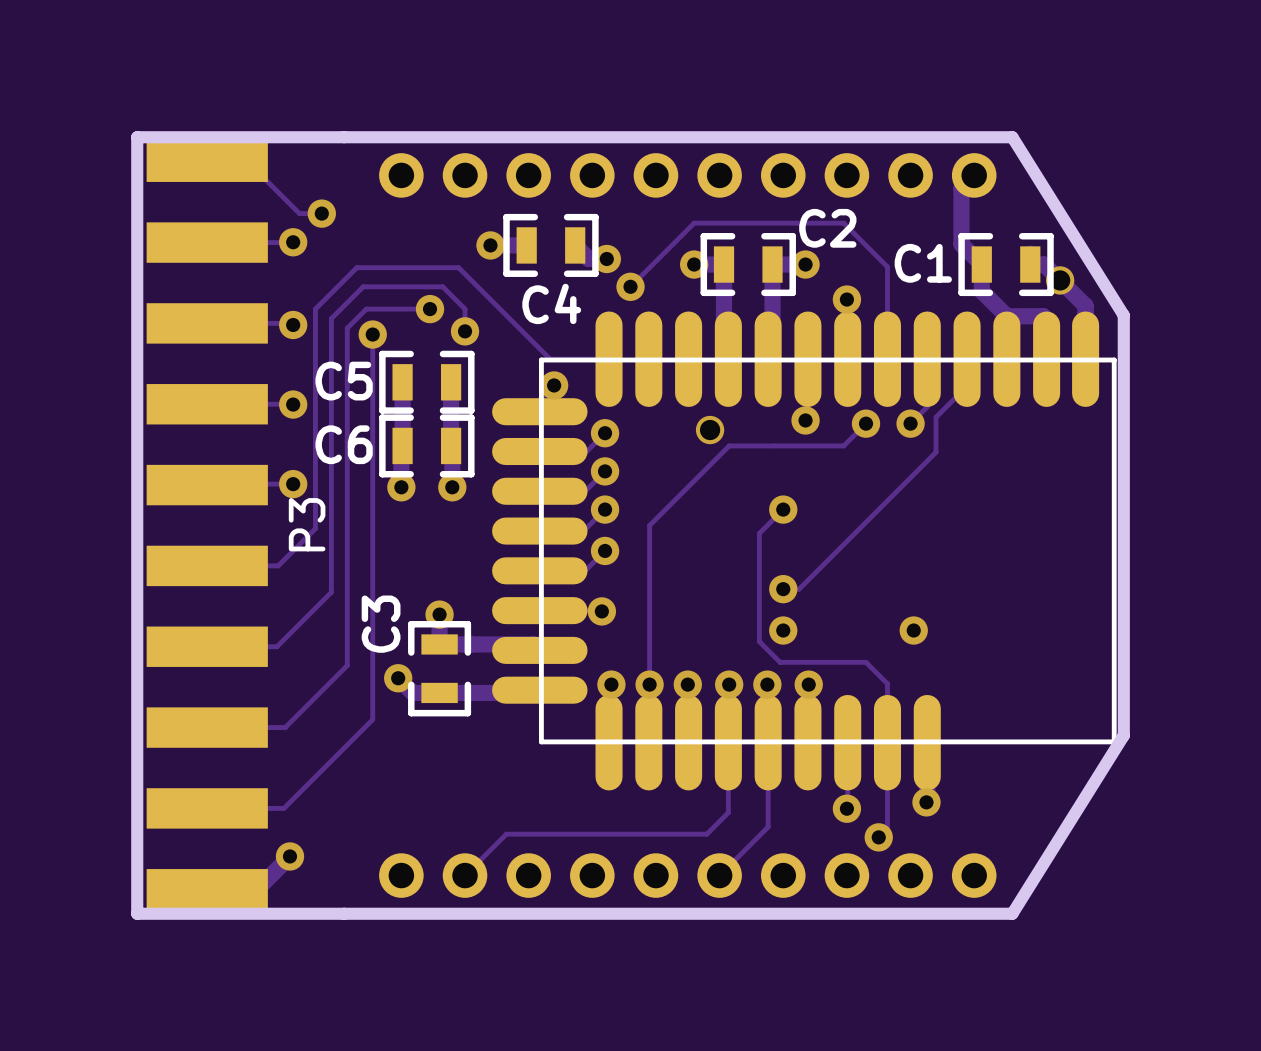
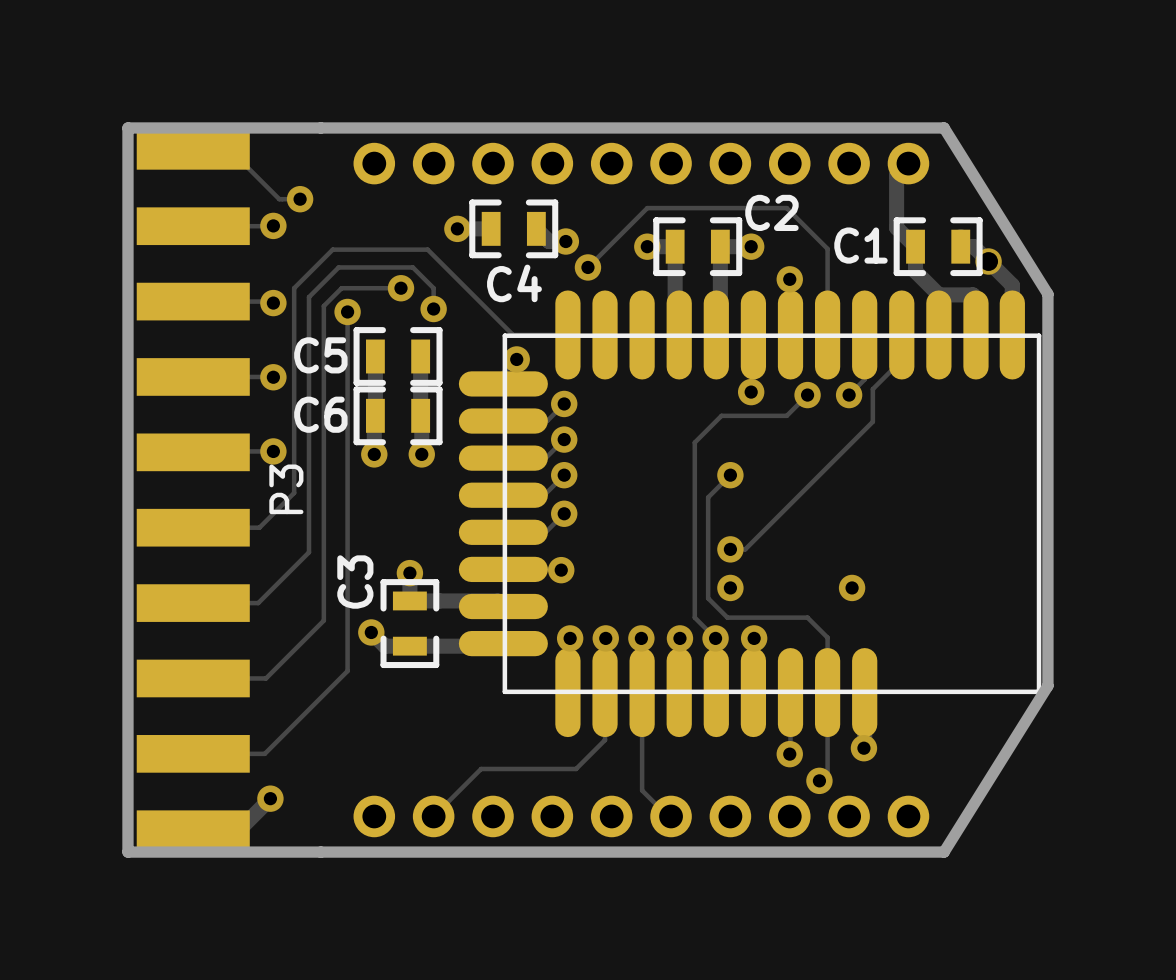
via: (710, 430) -> none
track: (773, 445) (729, 445) (649, 525) (649, 684) -> (721, 415) (694, 442) (694, 617) (715, 638)
track: none -> (642, 692) (642, 790) (668, 816)
track: (728, 742) (728, 812) (706, 834) (506, 834) -> (605, 692) (605, 740) (576, 768) (481, 768) (472, 777)
track: (768, 742) (768, 827) (719, 875) -> none

